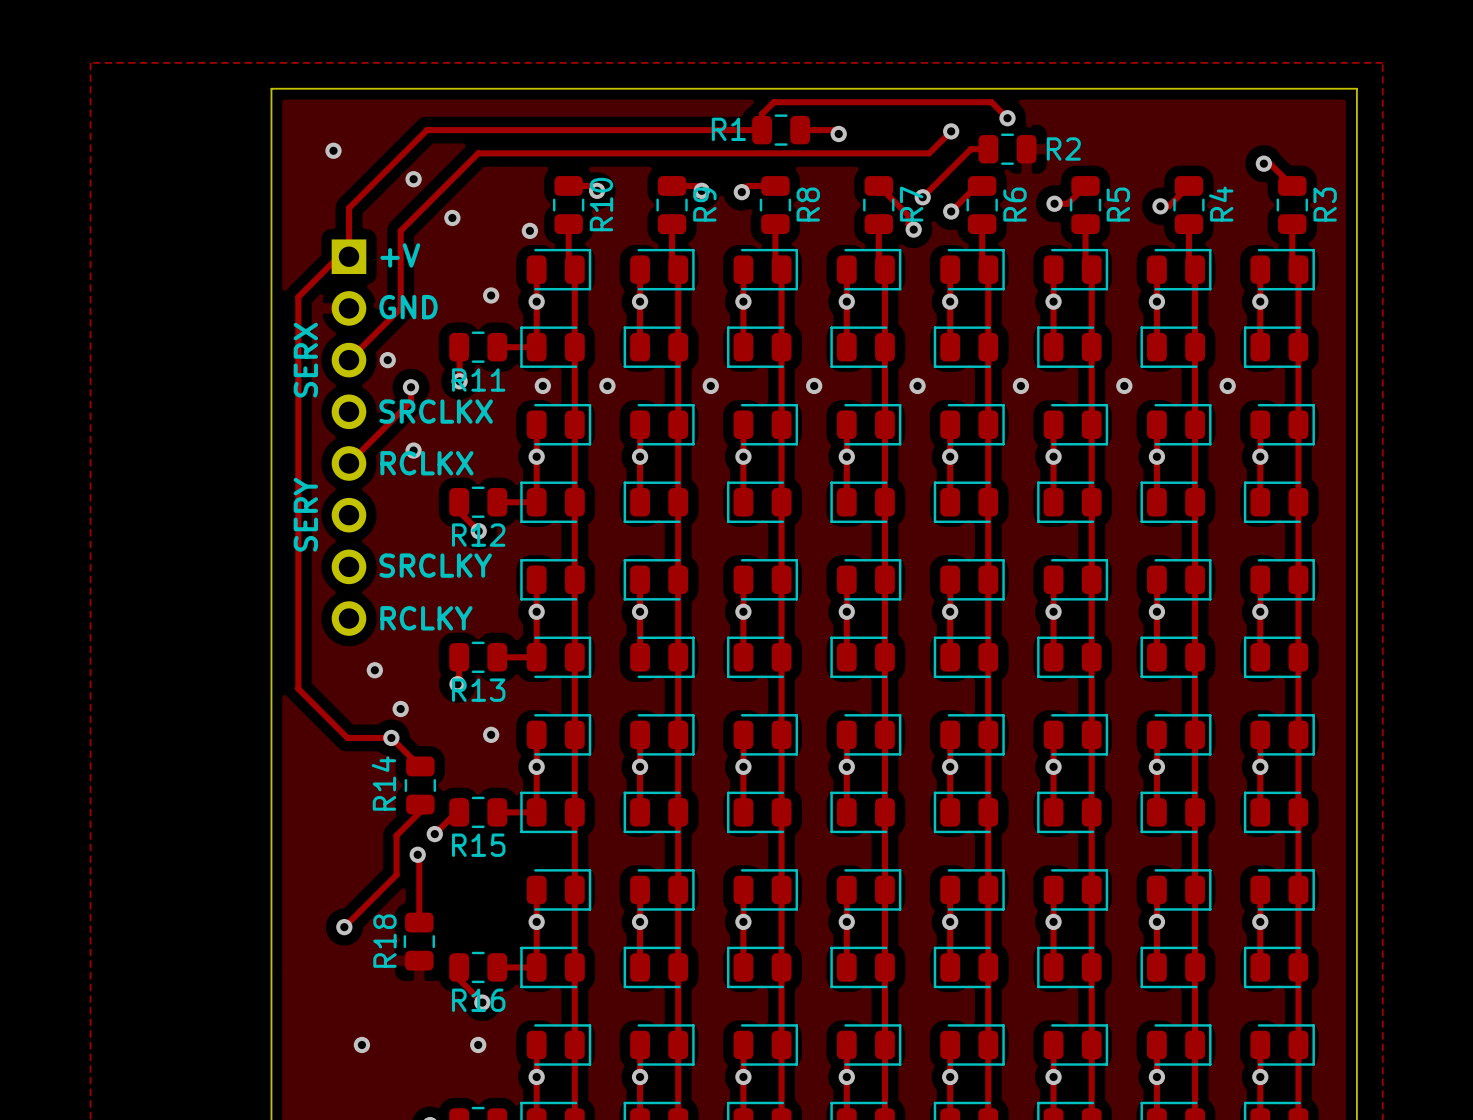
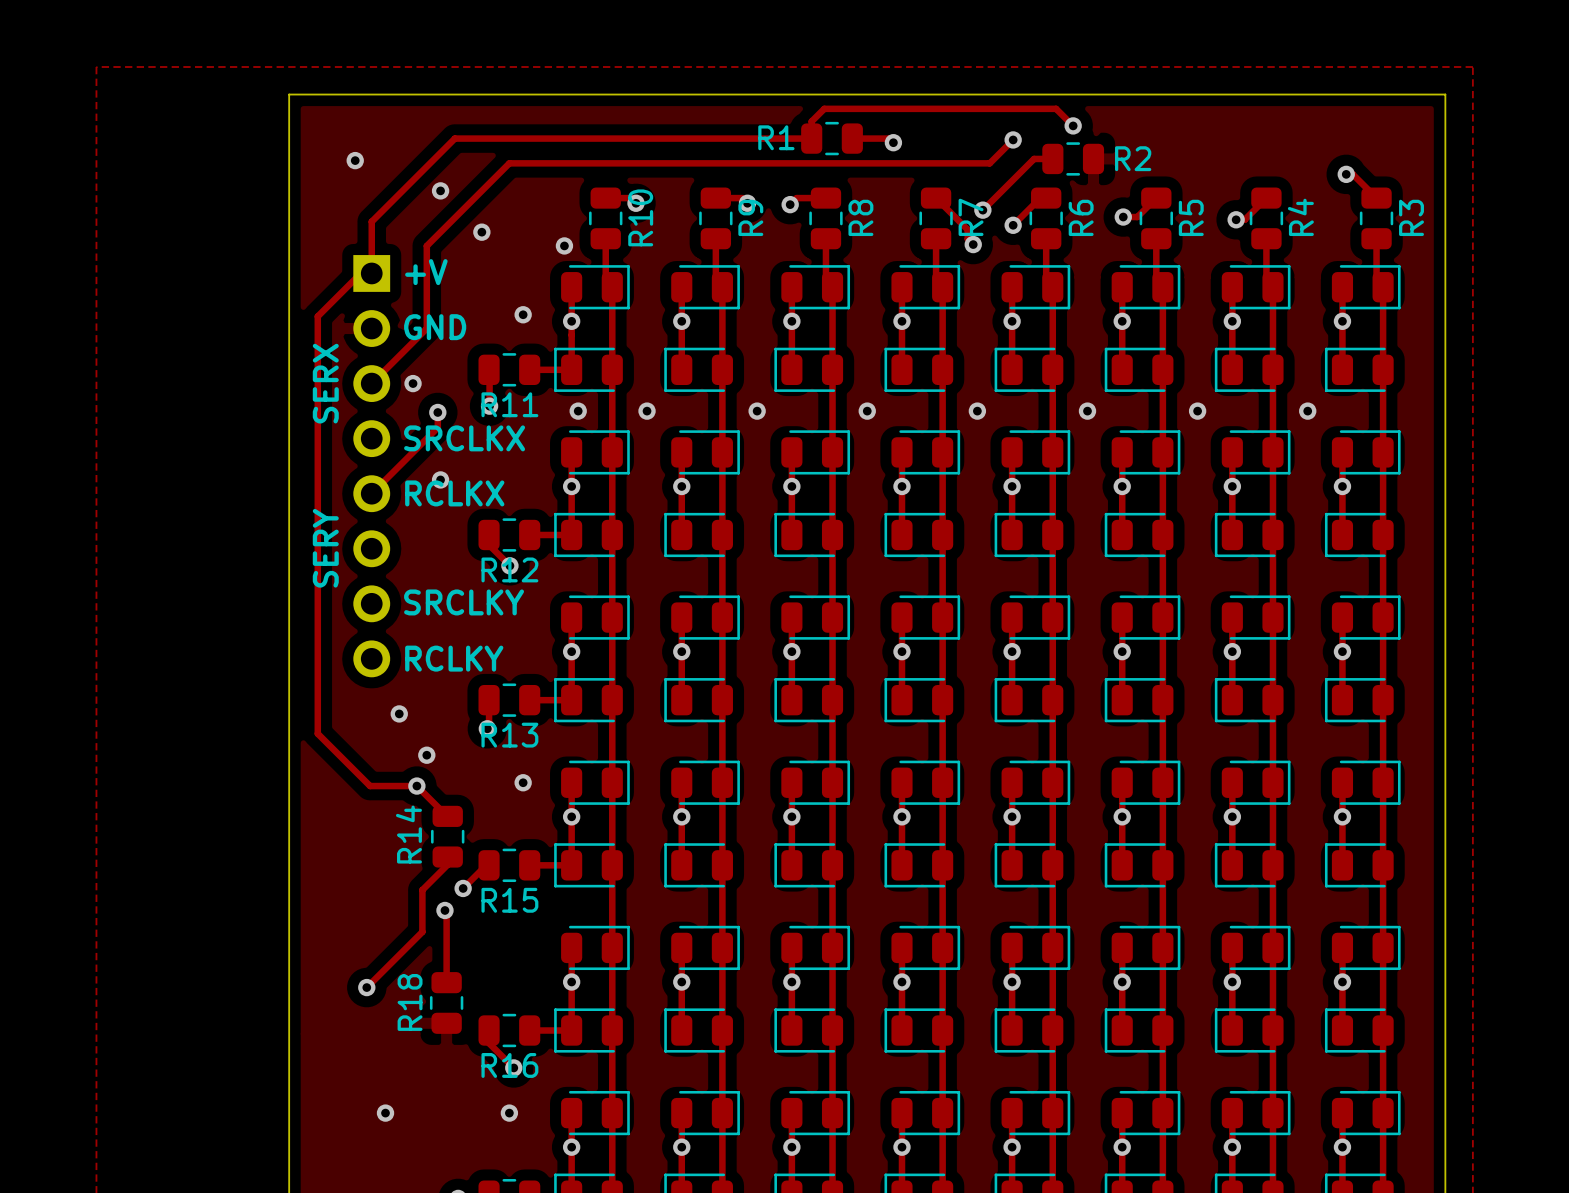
part rotation: 0° (552, 579) -> 180° (595, 617)
part rotation: 0° (655, 579) -> 180° (705, 617)
part rotation: 0° (559, 657) -> 180° (588, 700)
part rotation: 0° (662, 657) -> 180° (698, 700)

